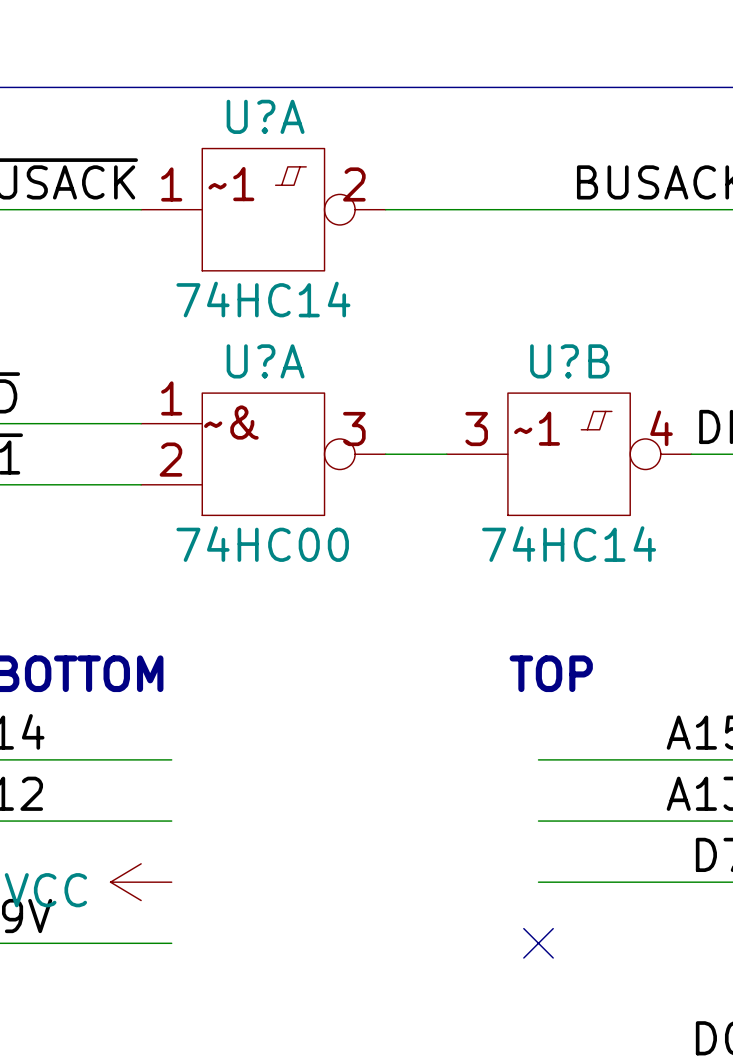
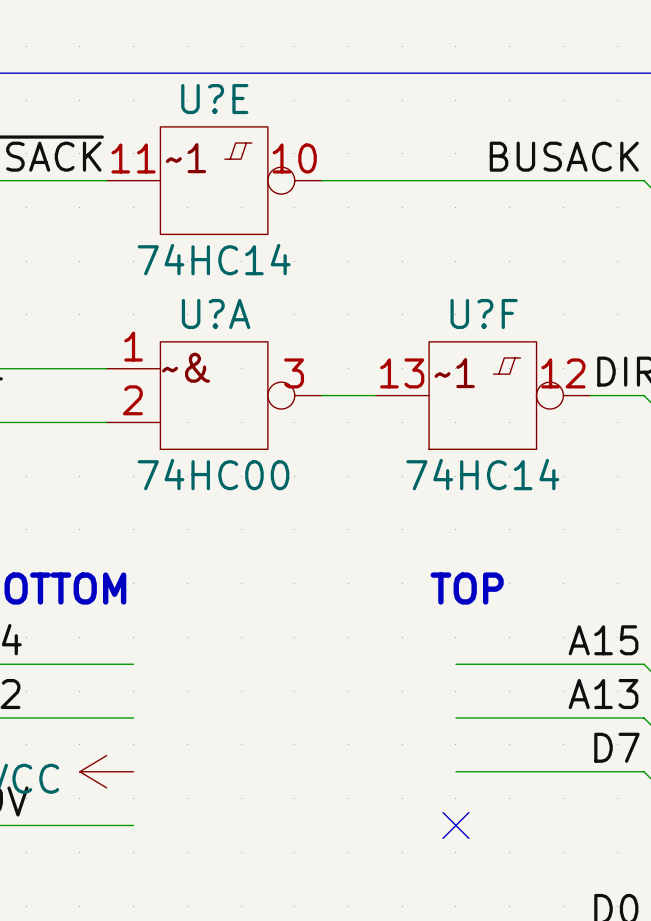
U?A name: U?A (265, 116) -> U?E (214, 99)
U?A pin number: 1 (171, 184) -> 11 (133, 158)
U?A pin number: 2 (354, 184) -> 10 (294, 158)
U?B name: U?B (569, 361) -> U?F (484, 313)
U?B pin number: 4 (661, 428) -> 12 (563, 373)
U?B pin number: 3 (476, 429) -> 13 (402, 373)

